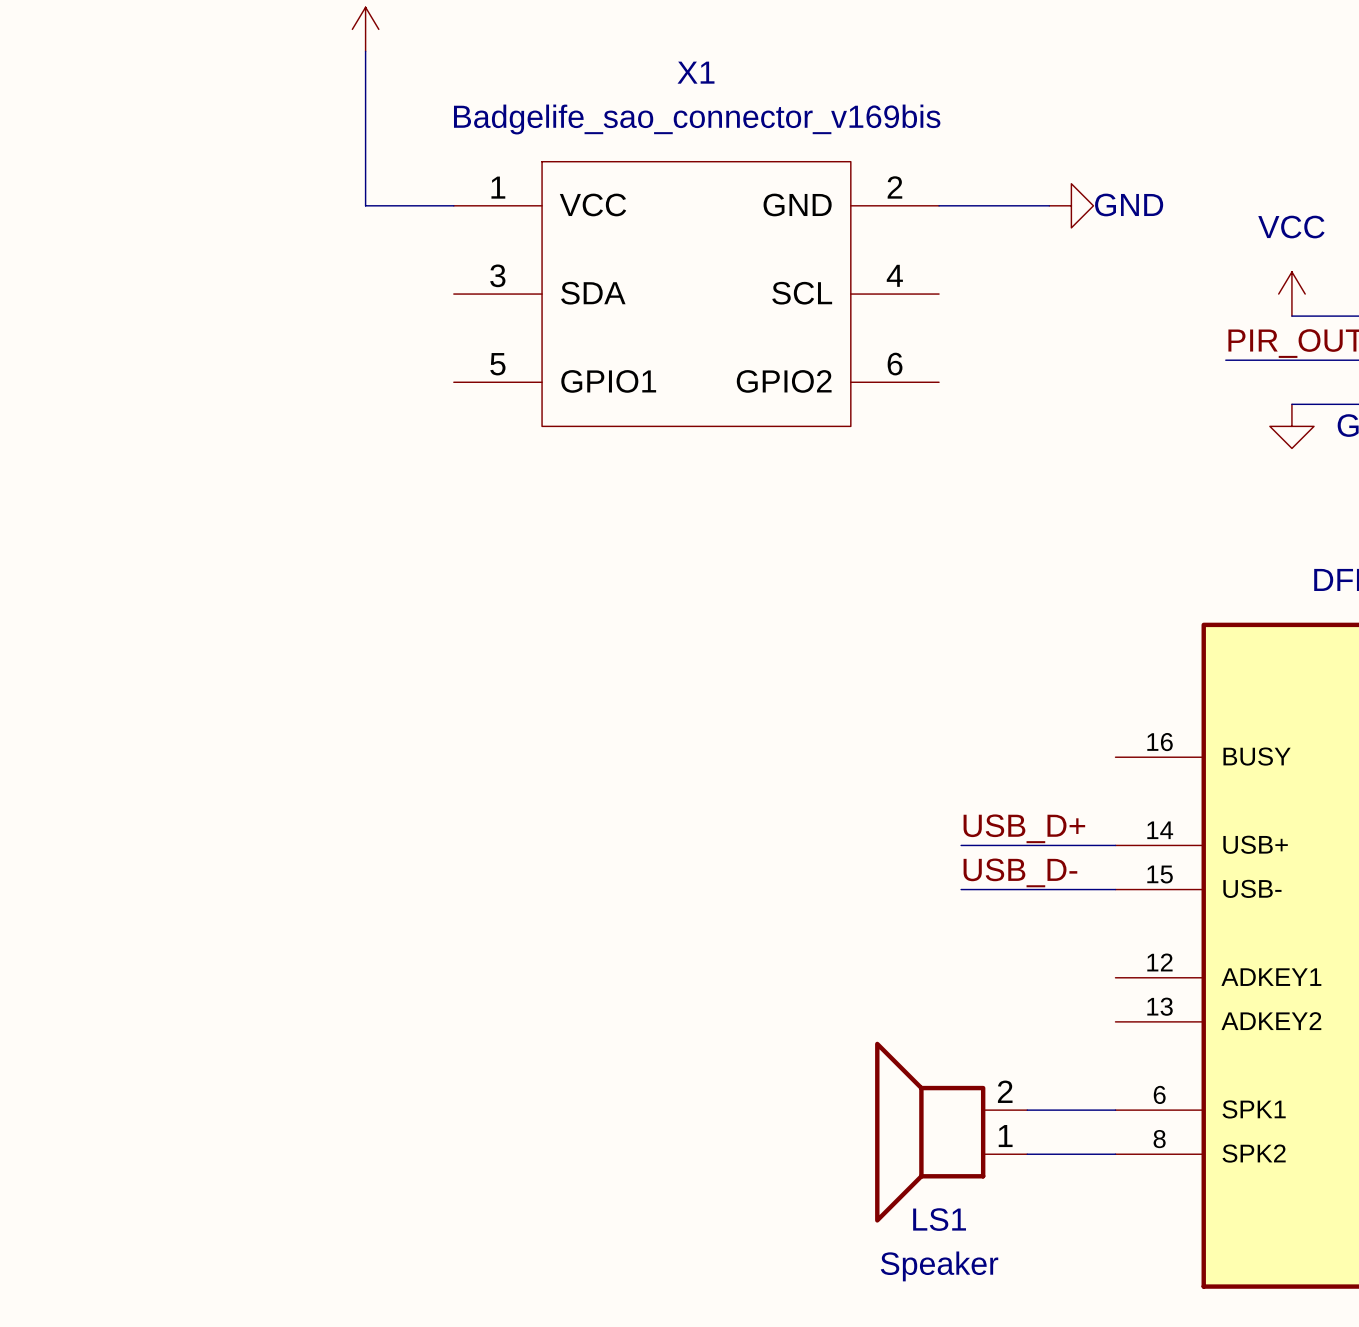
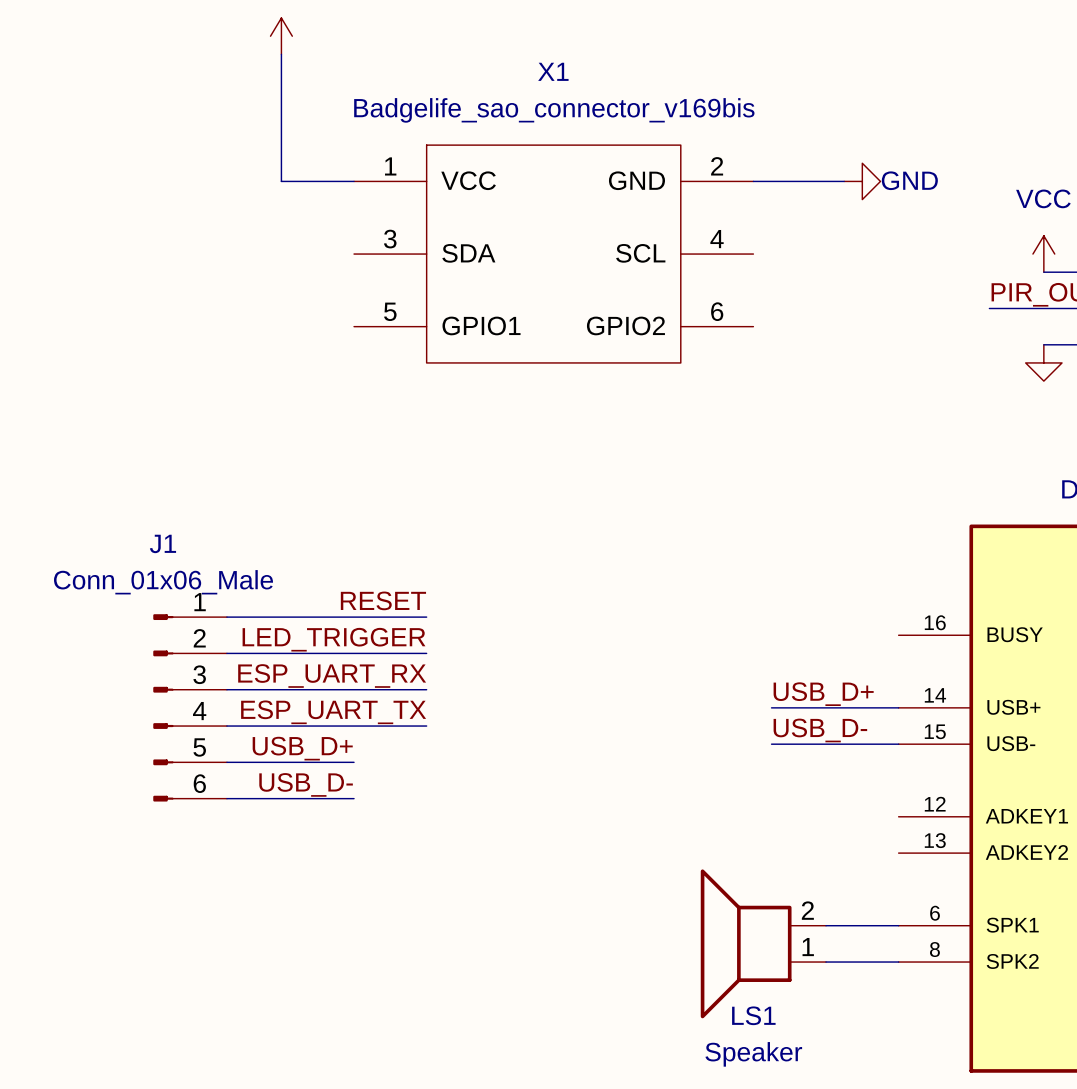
label: none -> RESET (383, 600)
wire: none -> (226, 617) (426, 617)
label: none -> LED_TRIGGER (334, 639)
wire: none -> (226, 653) (426, 653)
label: none -> ESP_UART_RX (332, 676)
wire: none -> (226, 689) (426, 689)
J1: none -> Conn_01x06_Male (190, 707)
label: none -> ESP_UART_TX (333, 712)
wire: none -> (226, 726) (426, 726)
label: none -> USB_D+ (302, 748)
wire: none -> (226, 762) (354, 762)
label: none -> USB_D- (306, 784)
wire: none -> (226, 798) (354, 798)

